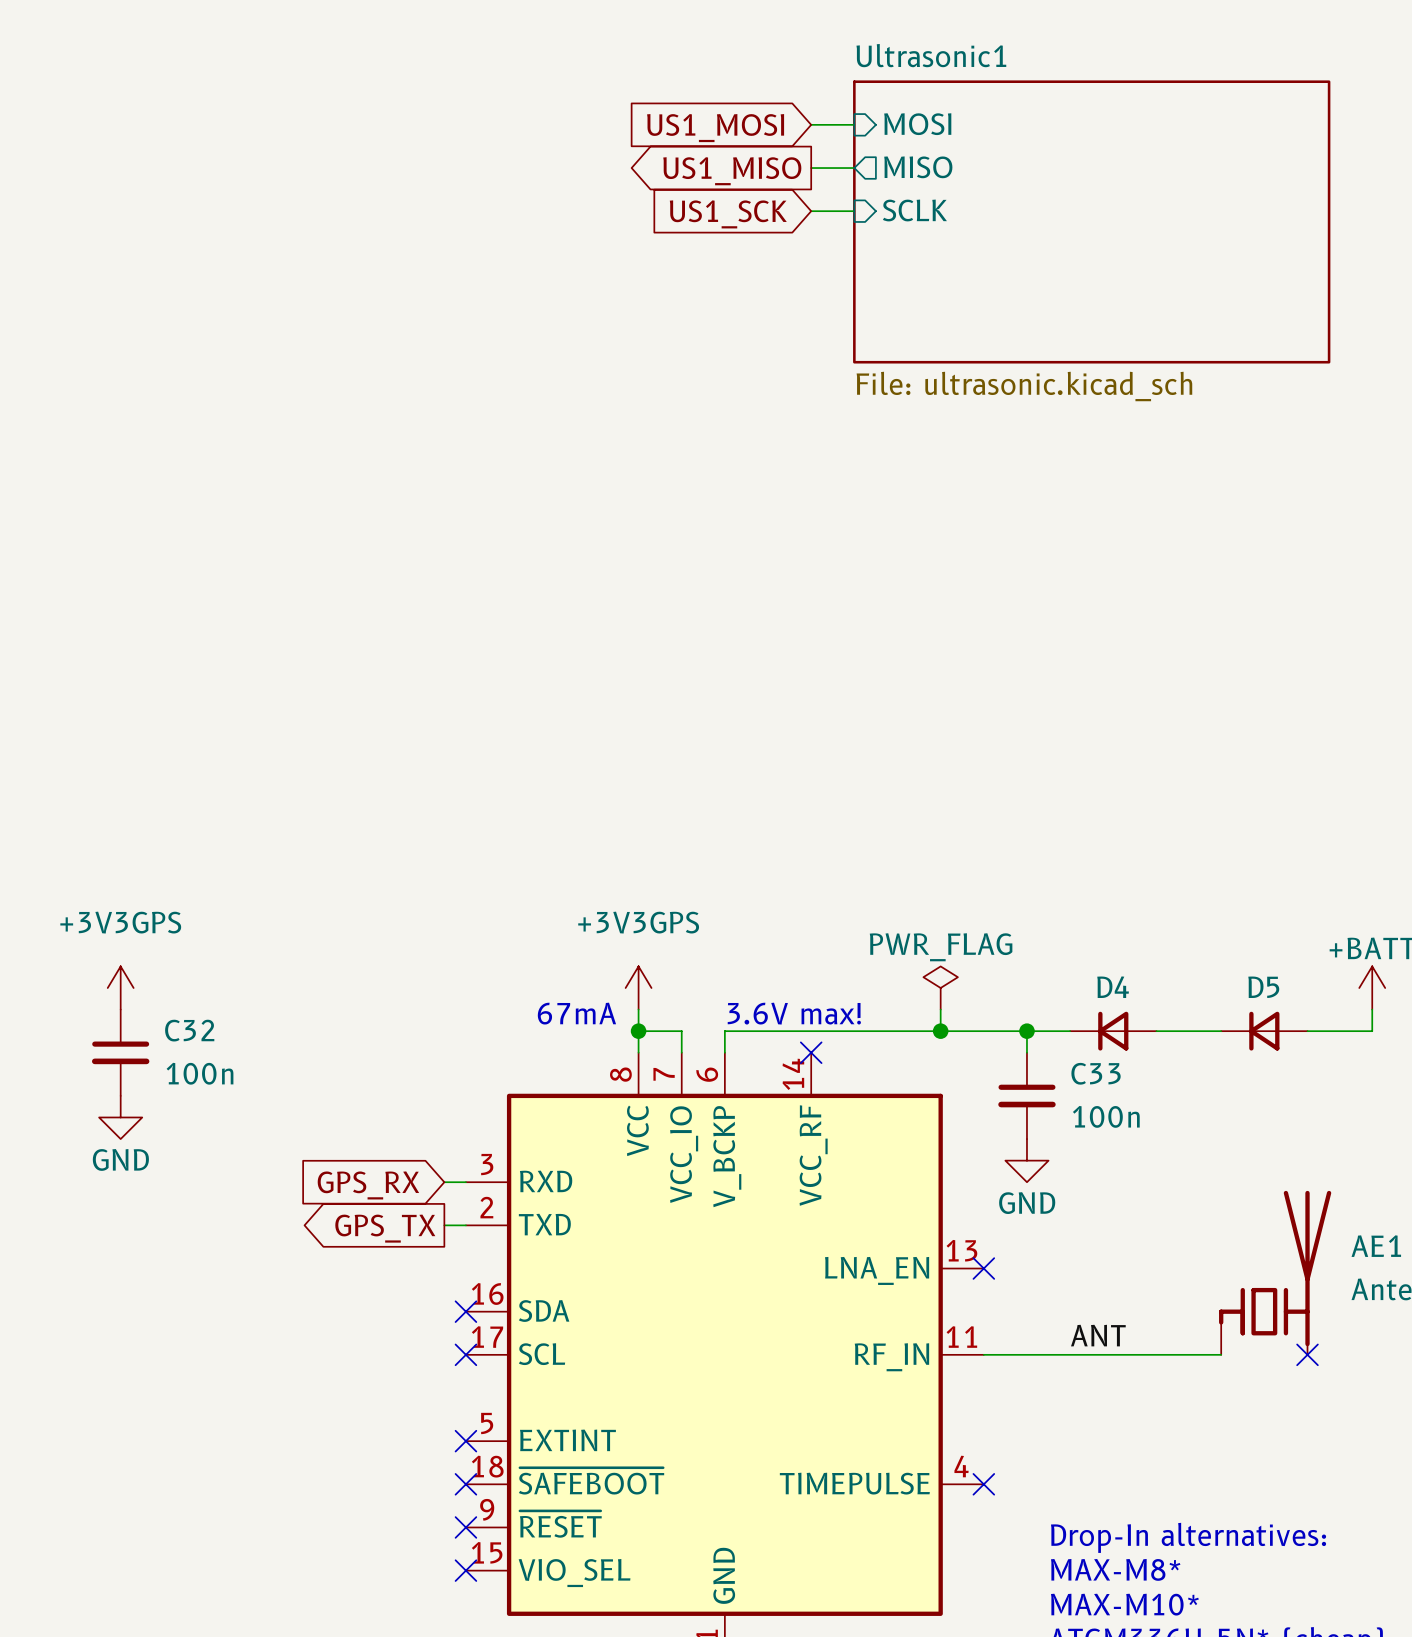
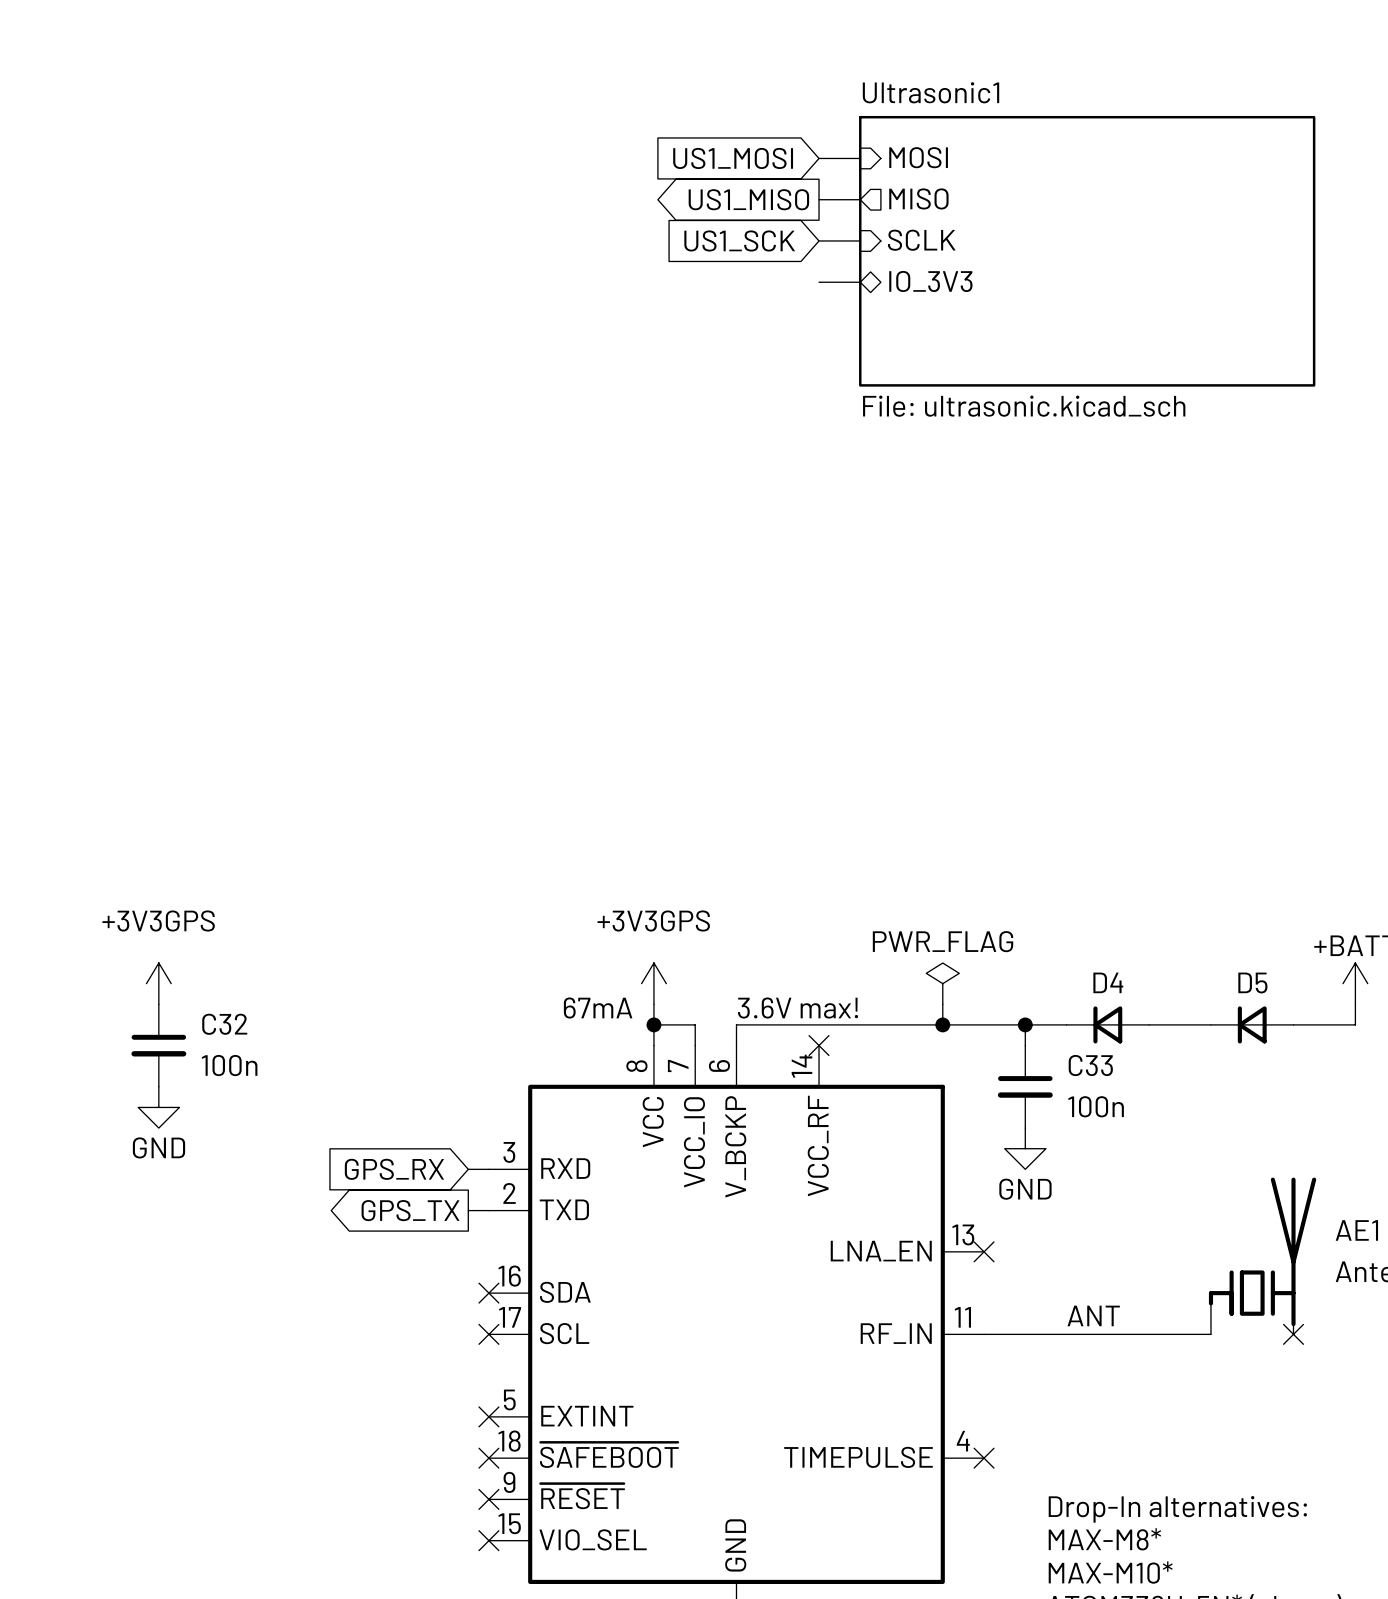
wire: none -> (819, 282) (860, 282)
sheet pin: none -> IO_3V3 (930, 281)

